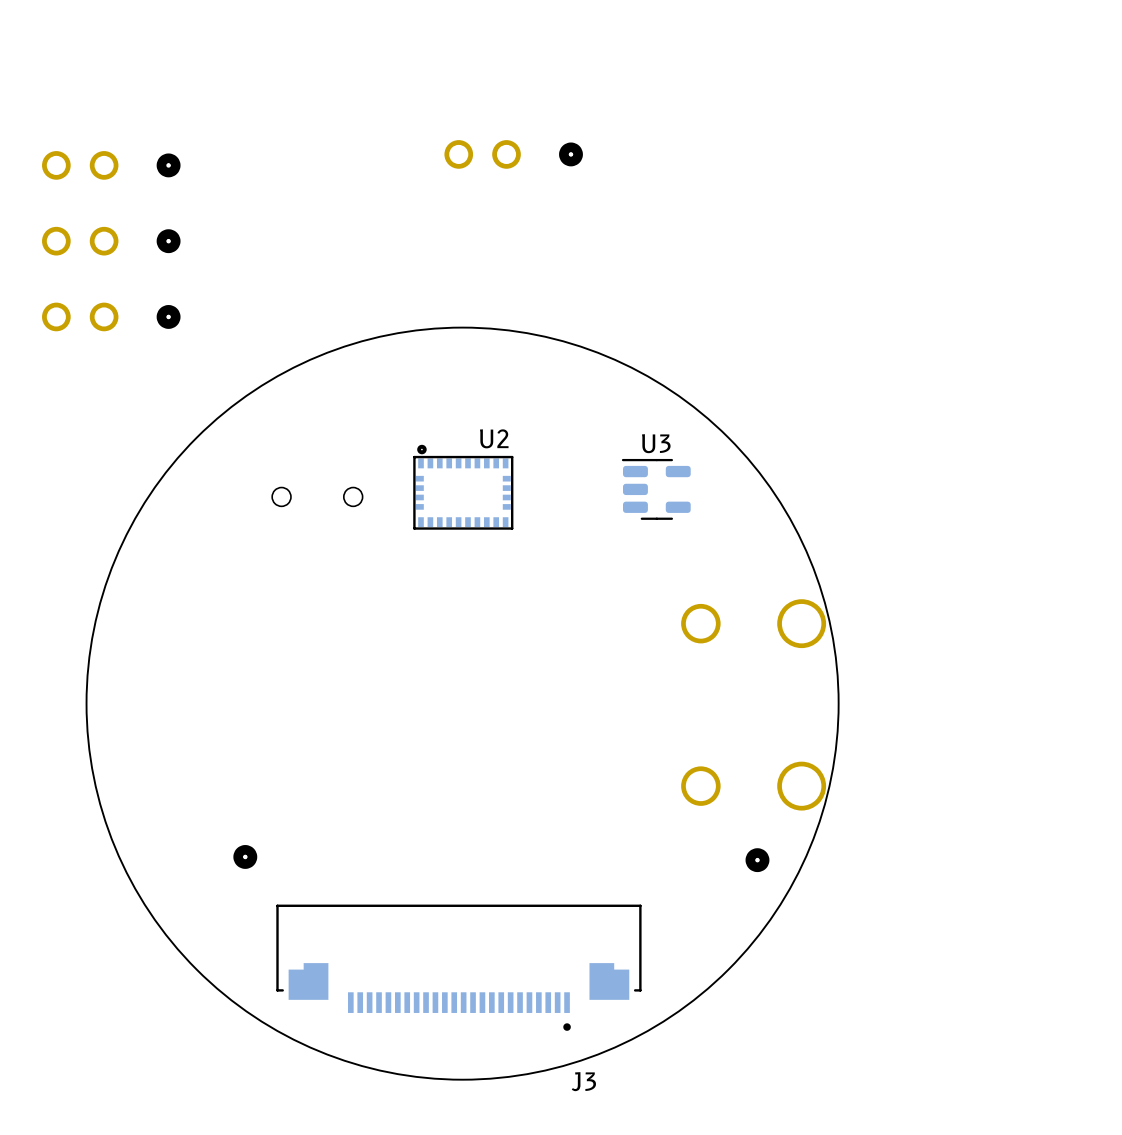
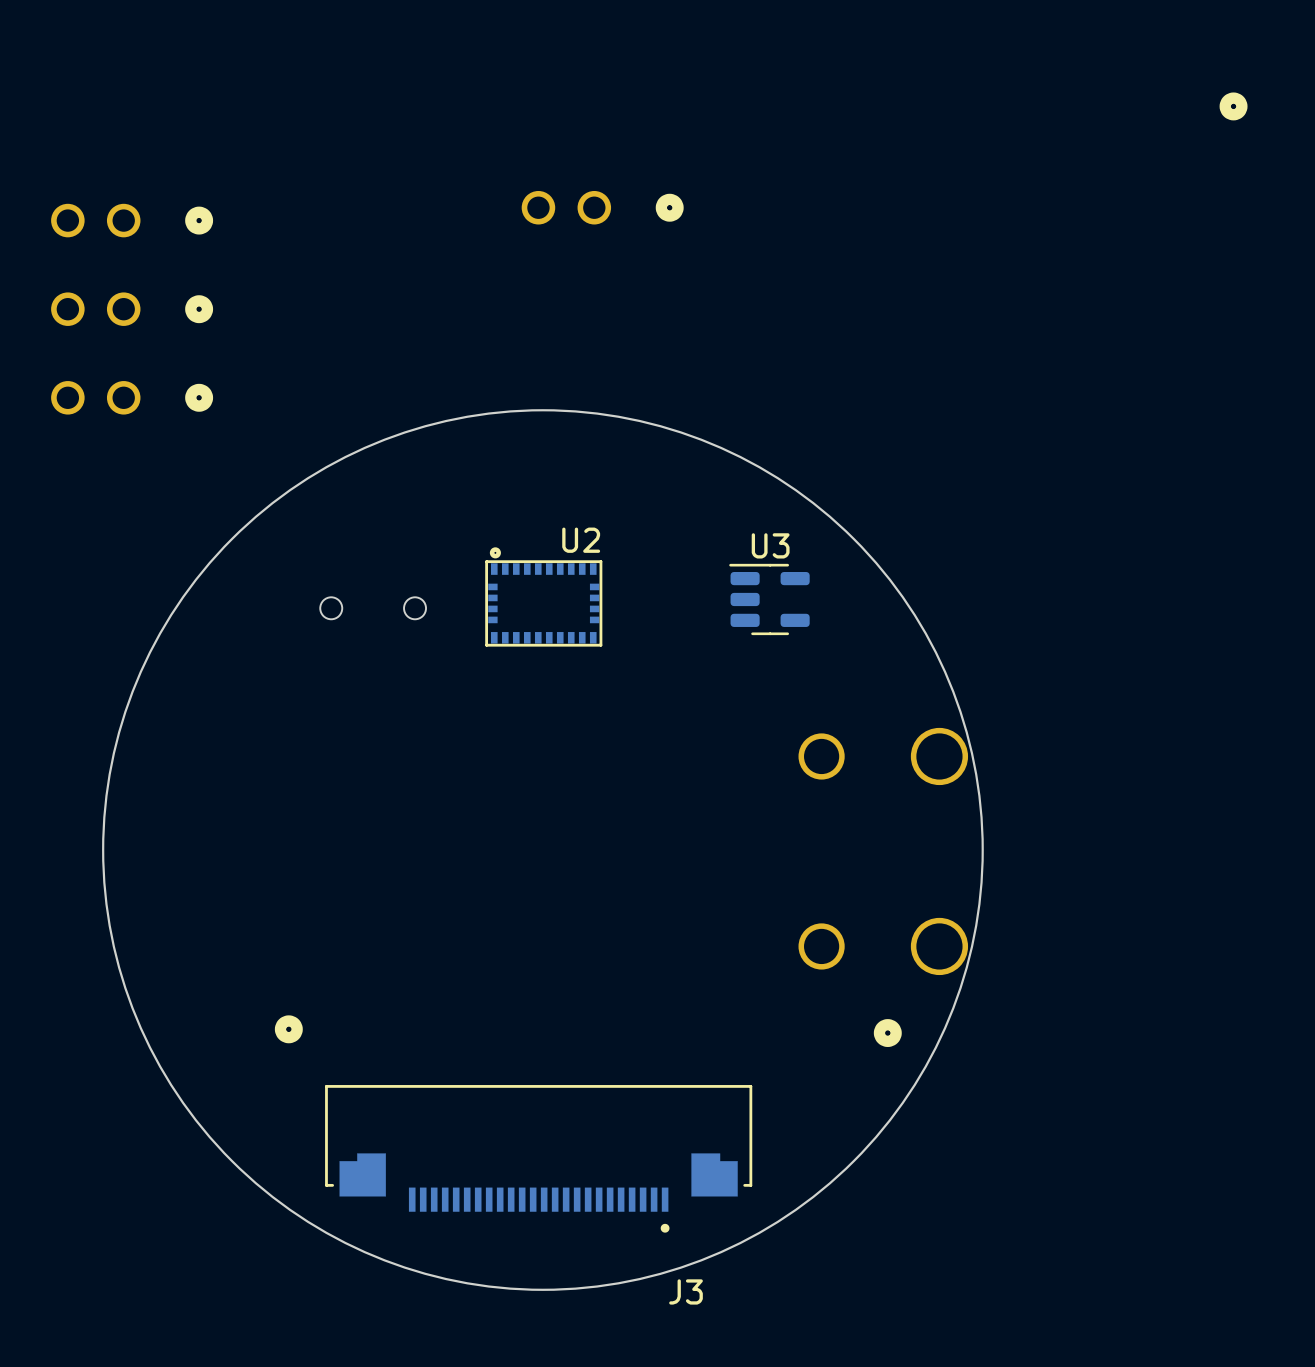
part: none -> (1233, 106)

